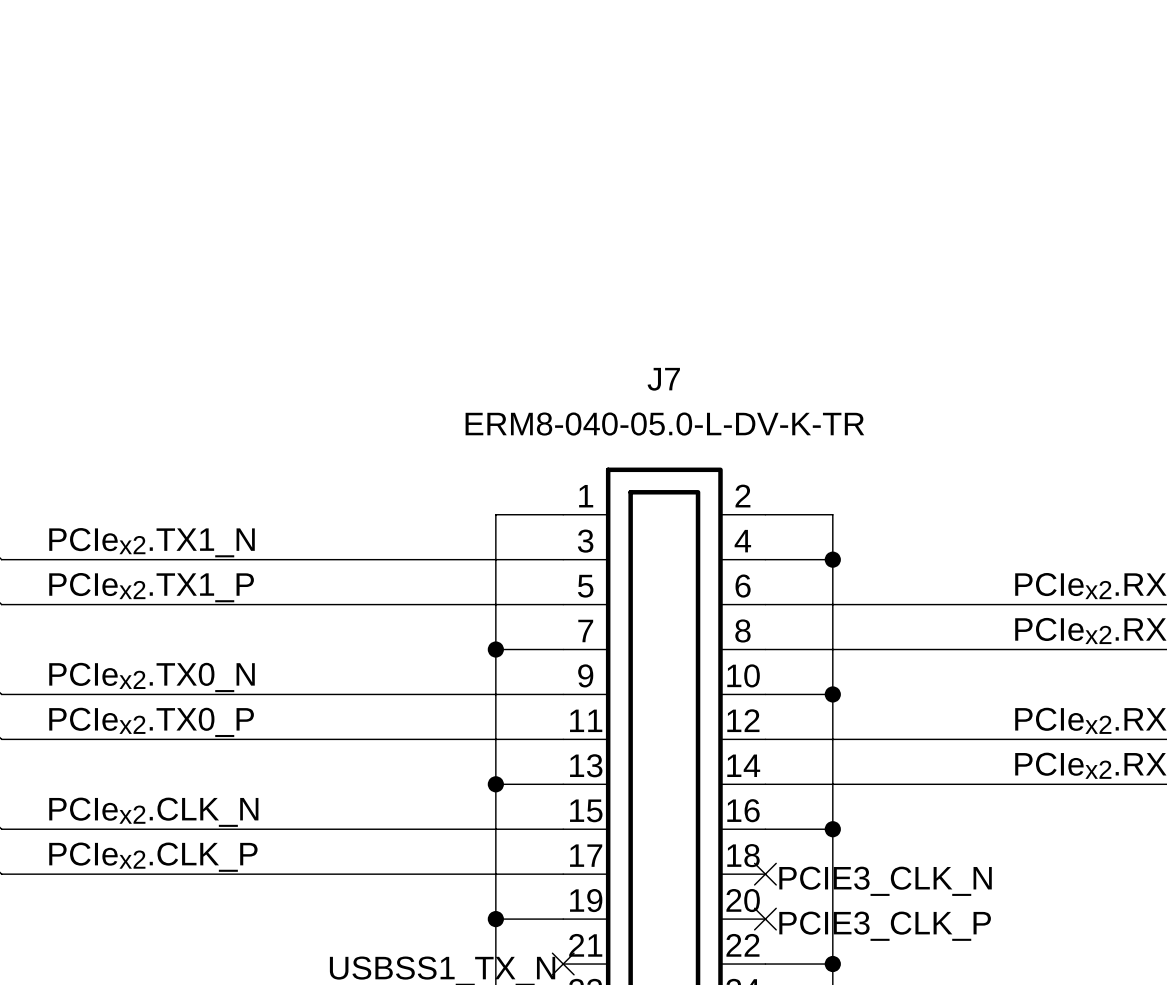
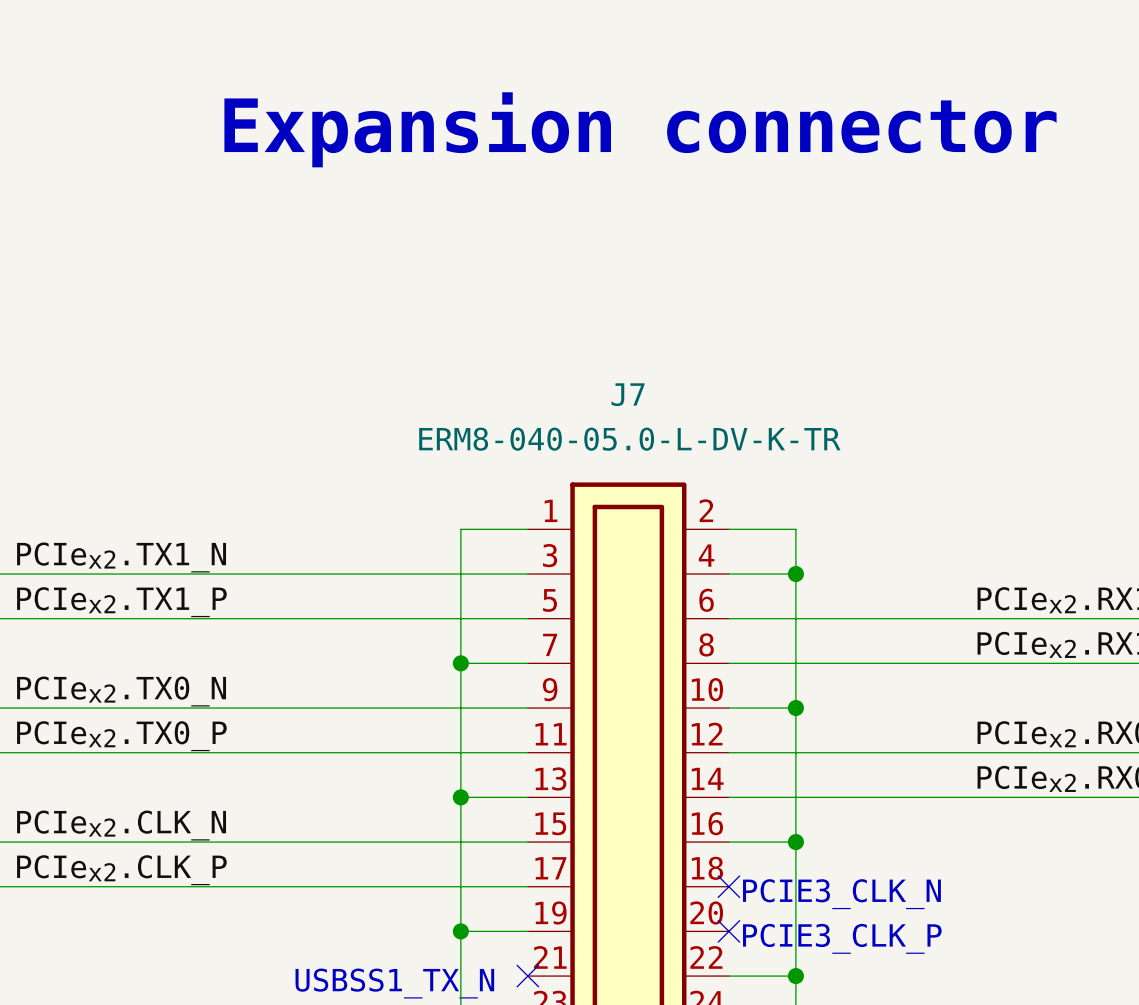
text: none -> Expansion connector (640, 129)

